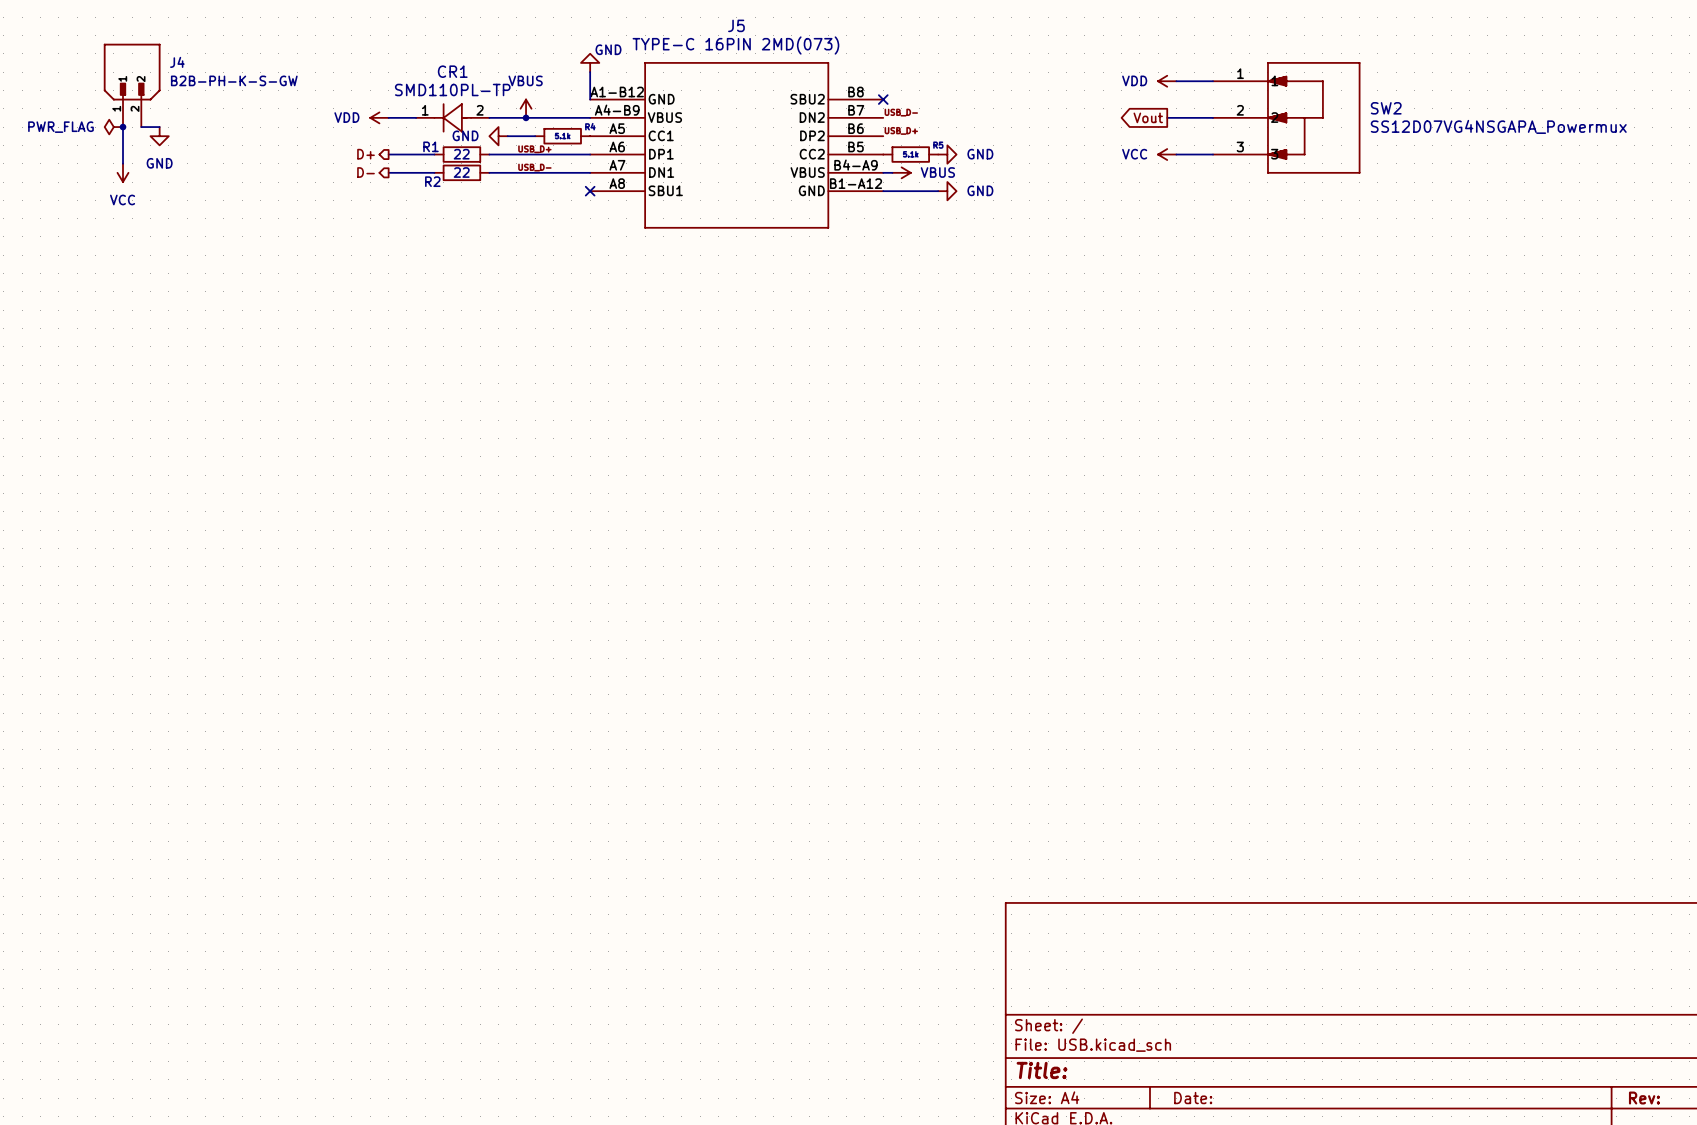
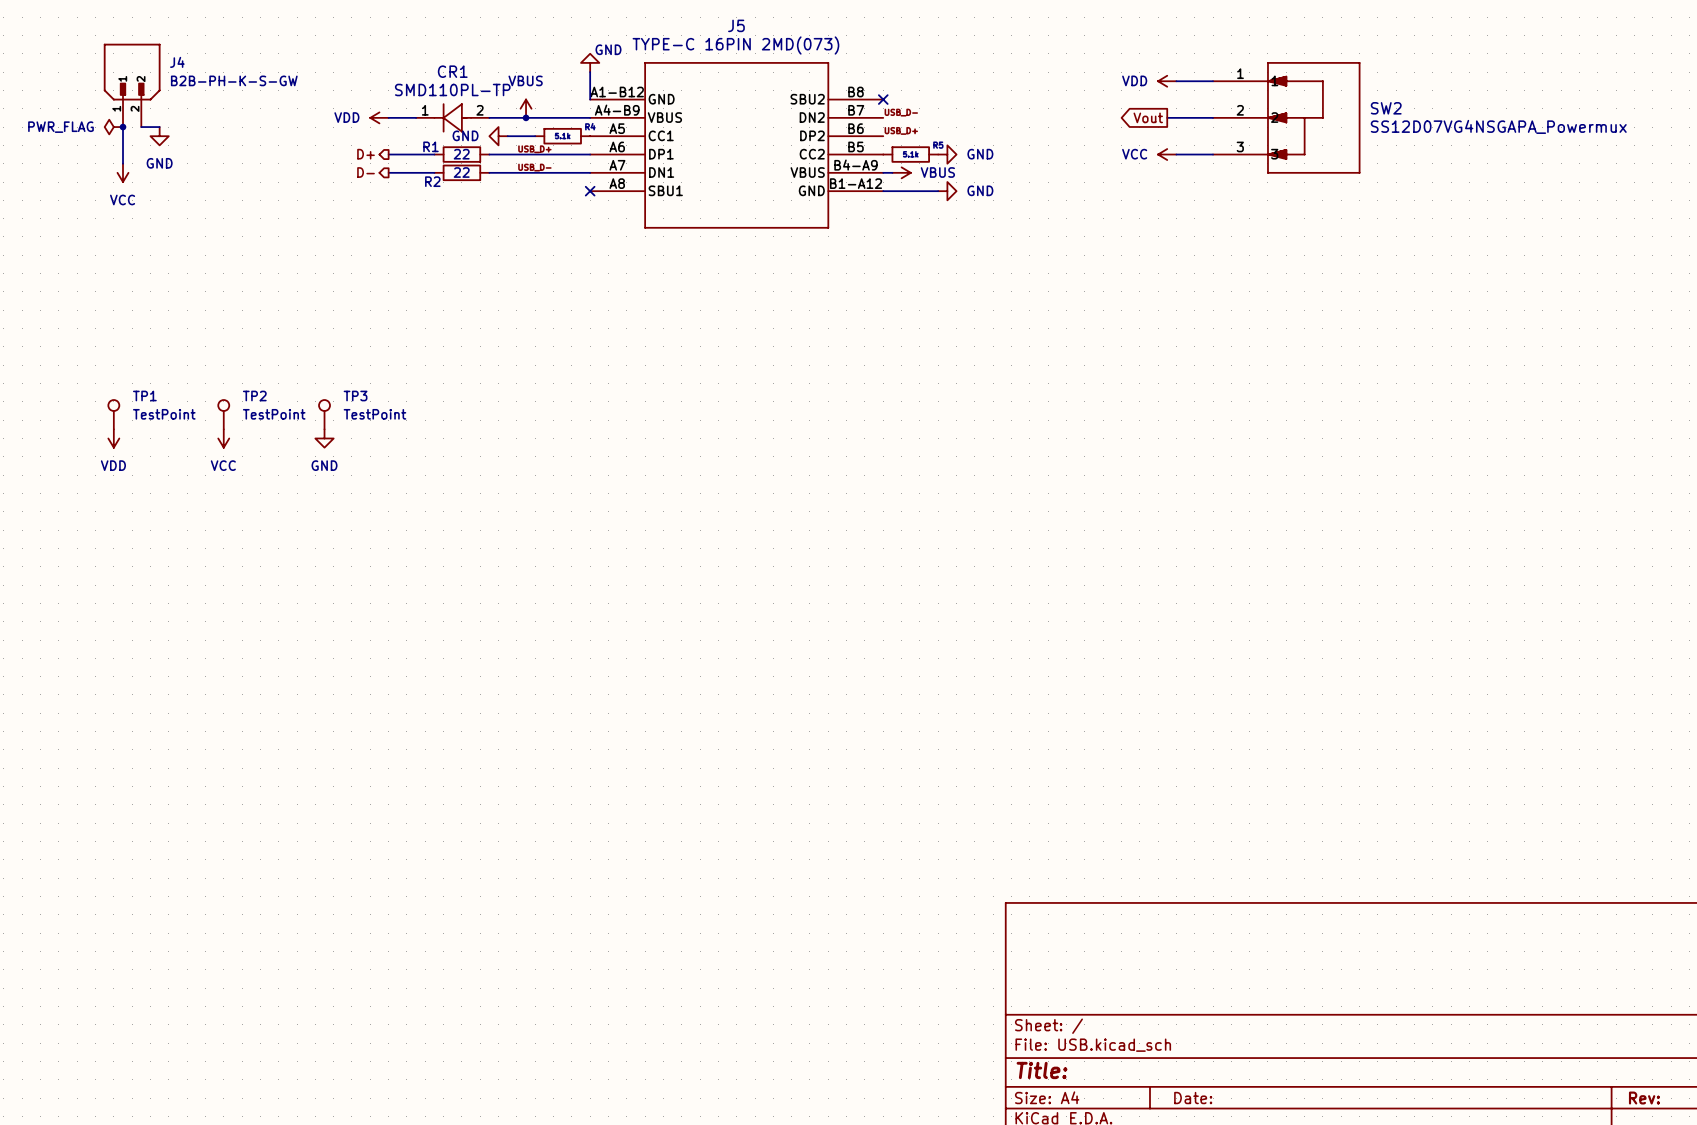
TP1: none -> TestPoint (113, 414)
TP2: none -> TestPoint (223, 414)
TP3: none -> TestPoint (324, 414)
power symbol: none -> VDD (113, 438)
power symbol: none -> VCC (223, 438)
power symbol: none -> GND (324, 438)

